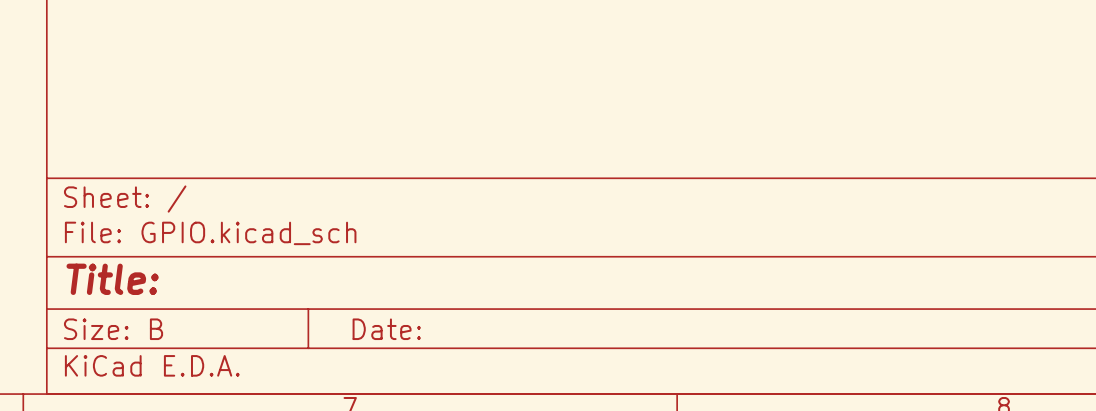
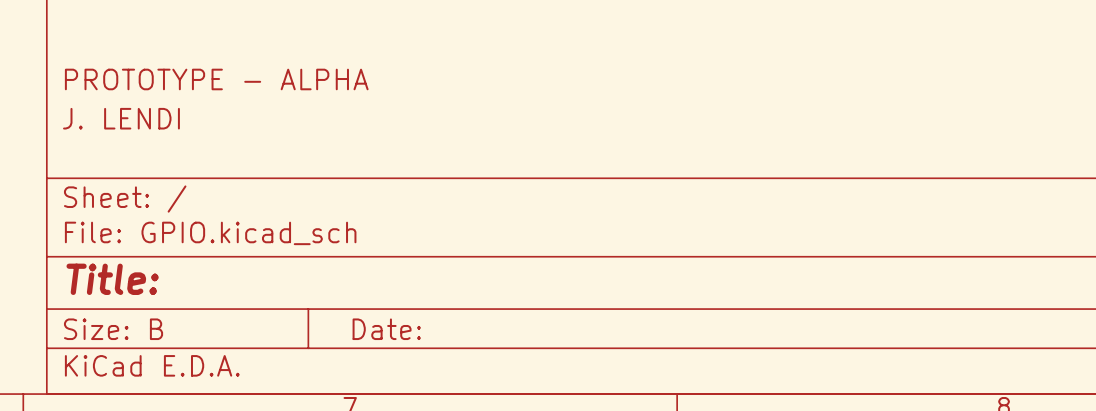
title block: none -> PROTOTYPE - ALPHA (216, 79)
title block: none -> J. LENDI (121, 118)

